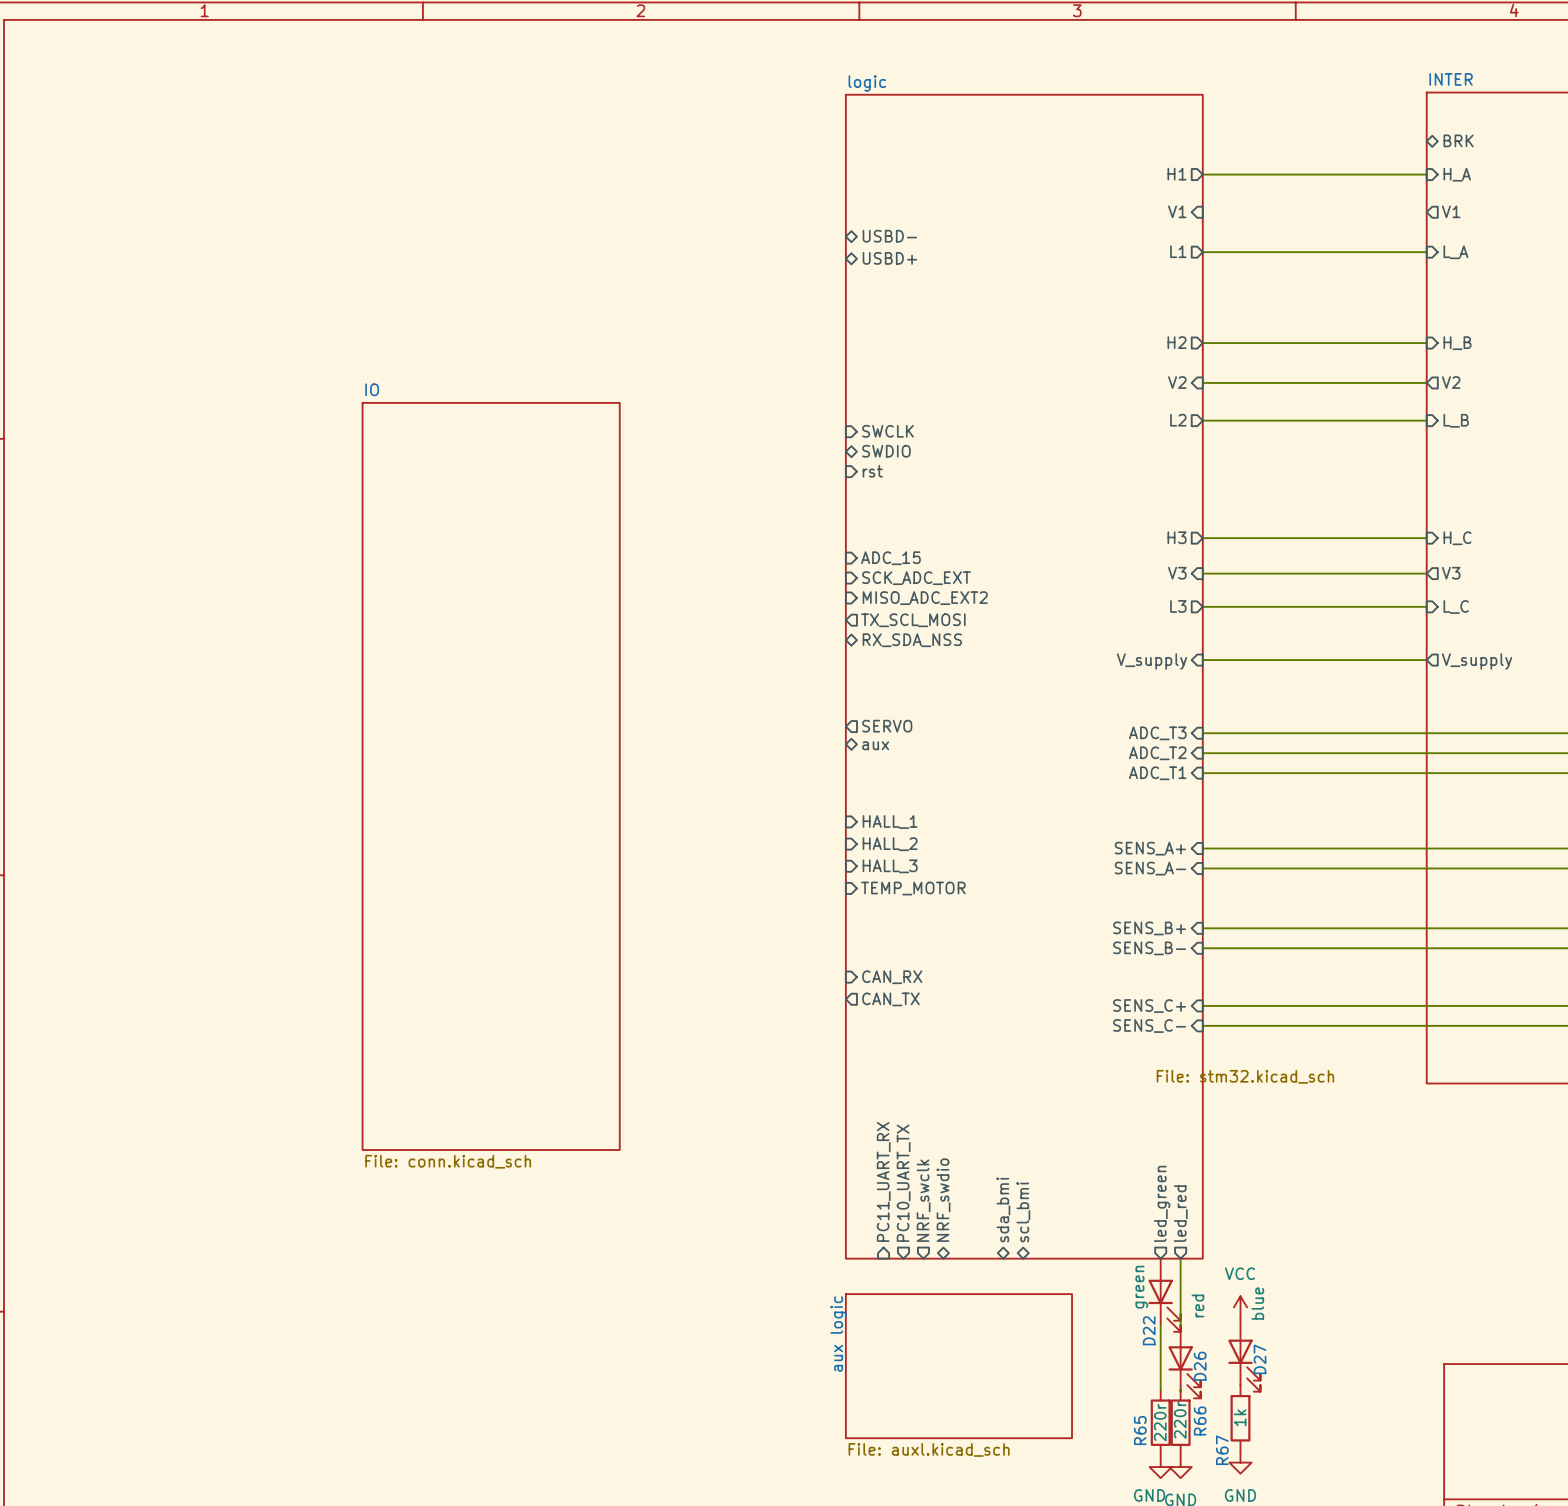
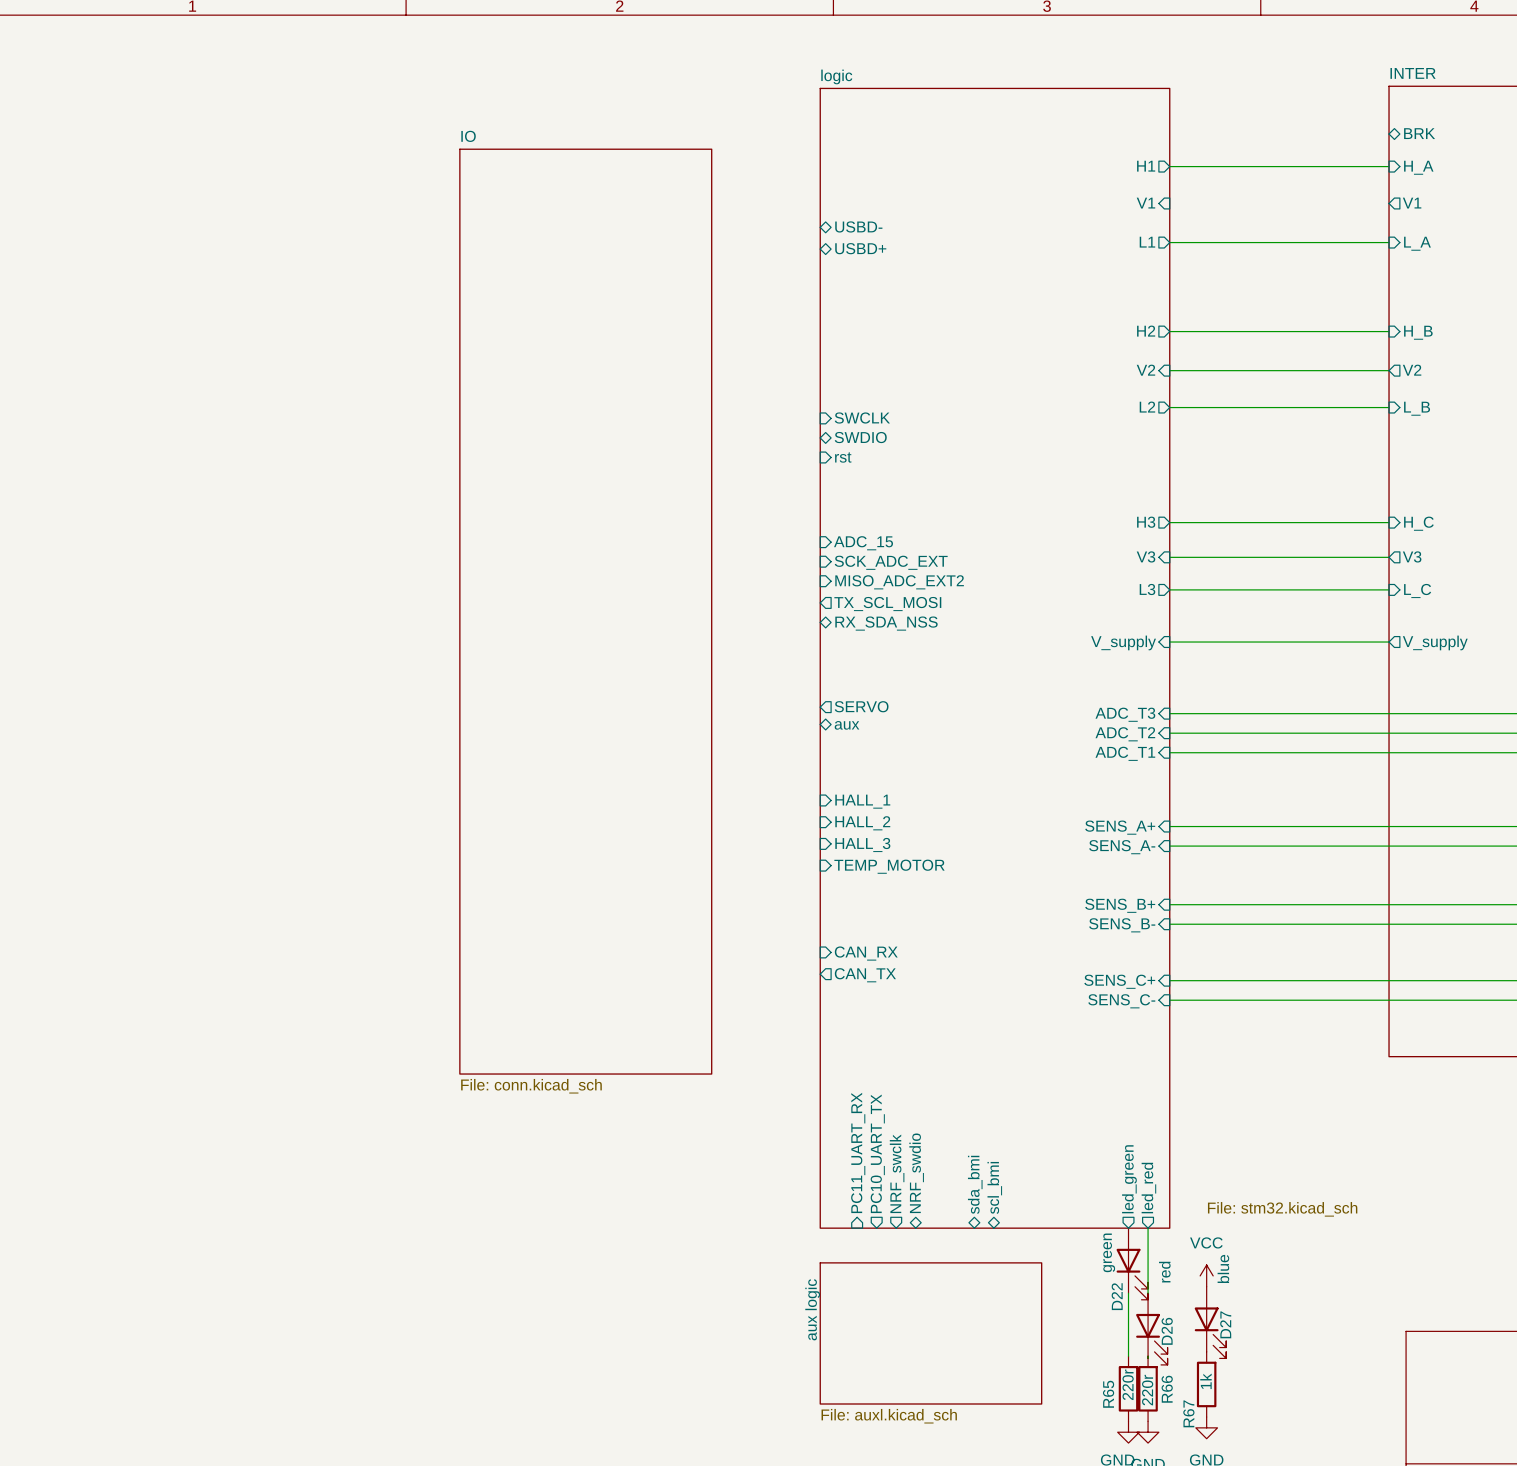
sheet IO: none -> File: conn.kicad_sch (585, 611)
sheet IO: File: conn.kicad_sch (491, 776) -> none
sheet logic value position: File: stm32.kicad_sch (1245, 1076) -> File: stm32.kicad_sch (1282, 1209)

